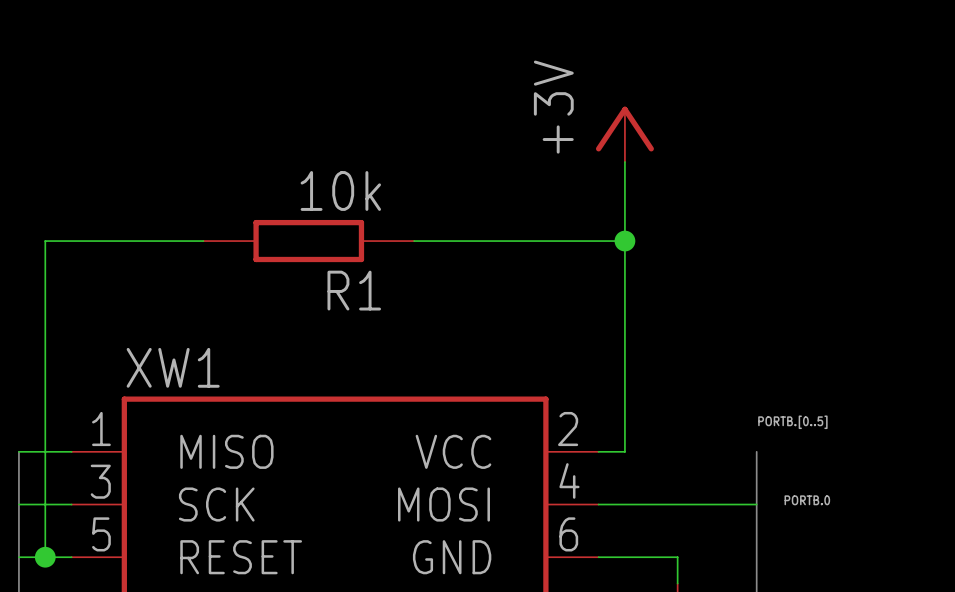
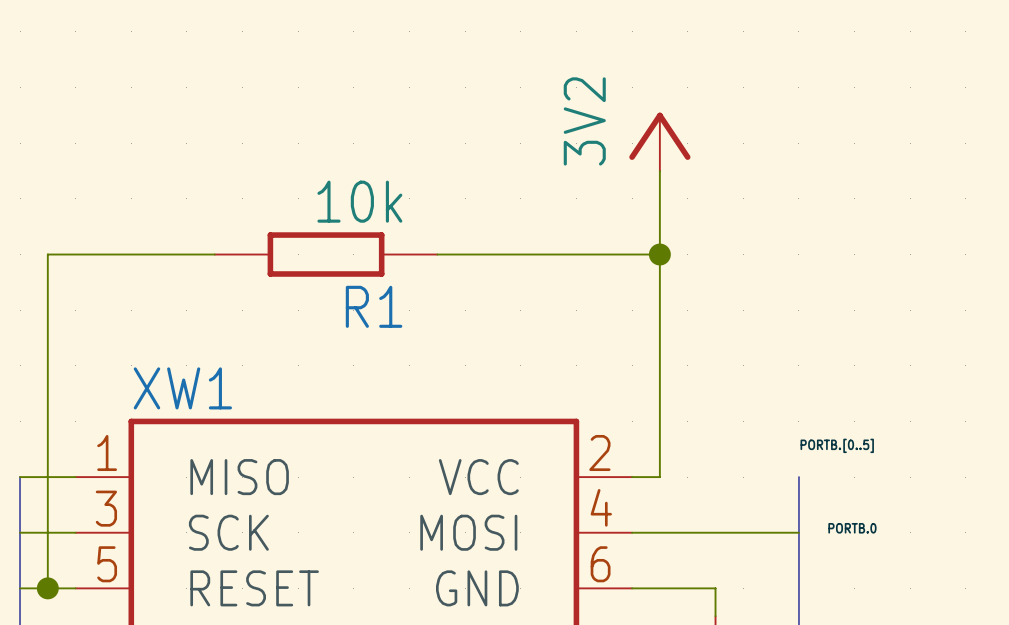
power symbol: +3V (624, 134) -> 3V2 (659, 141)

